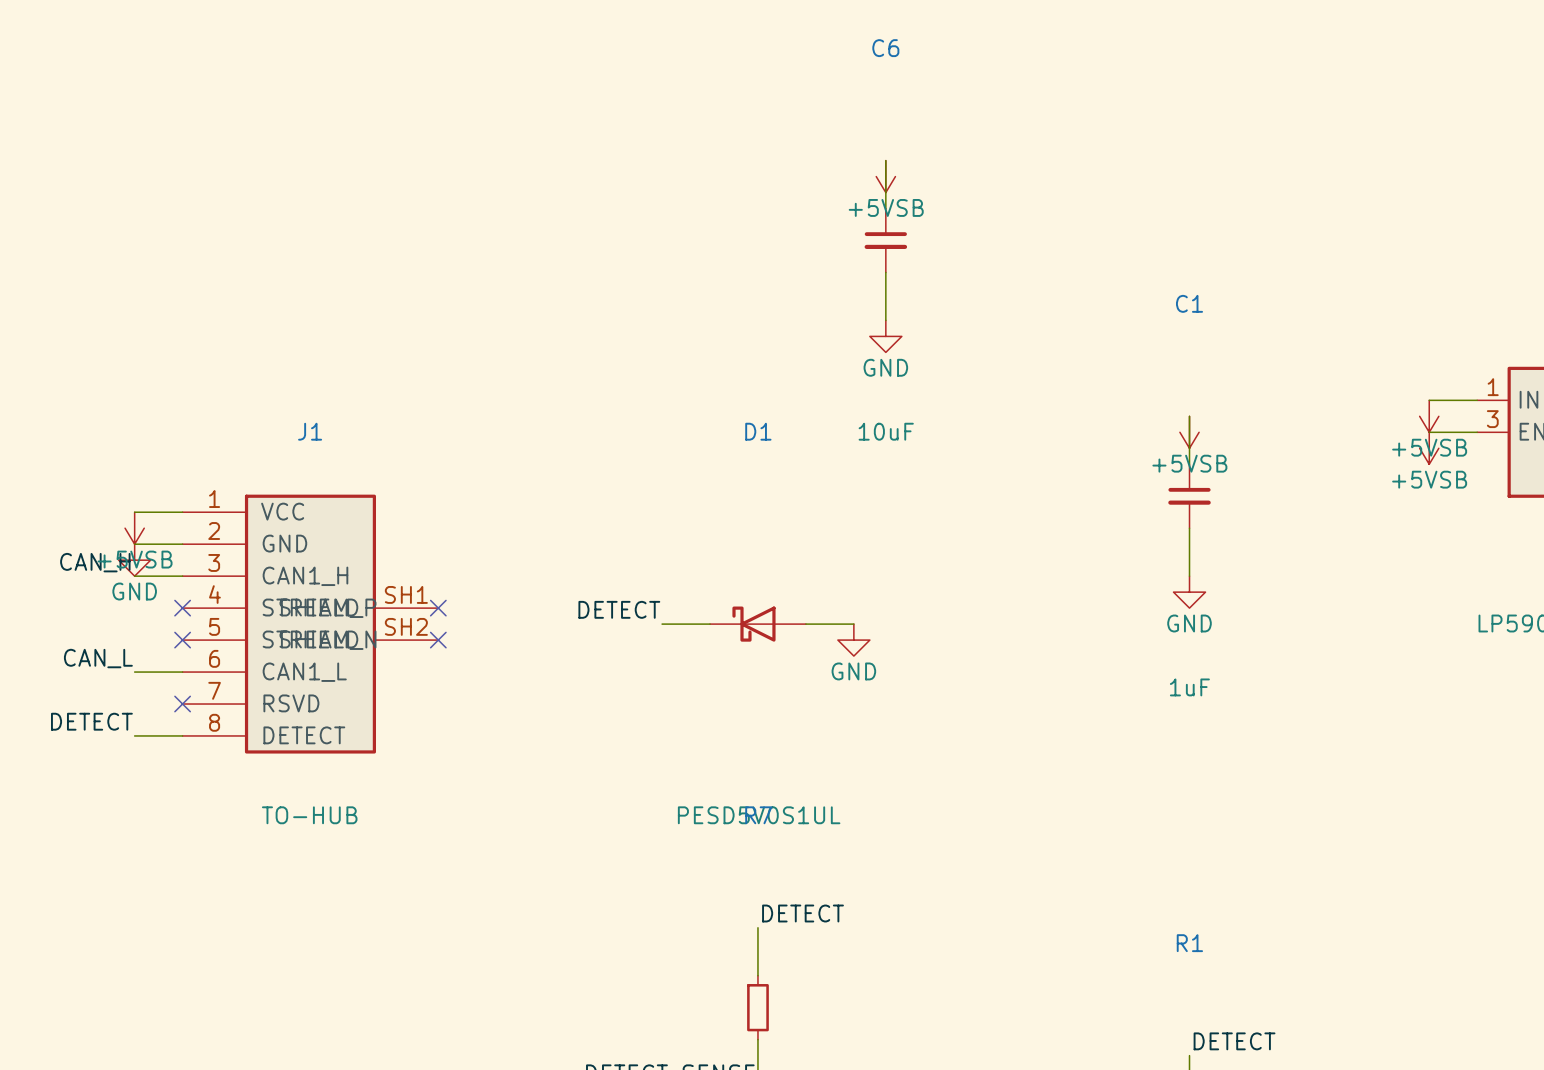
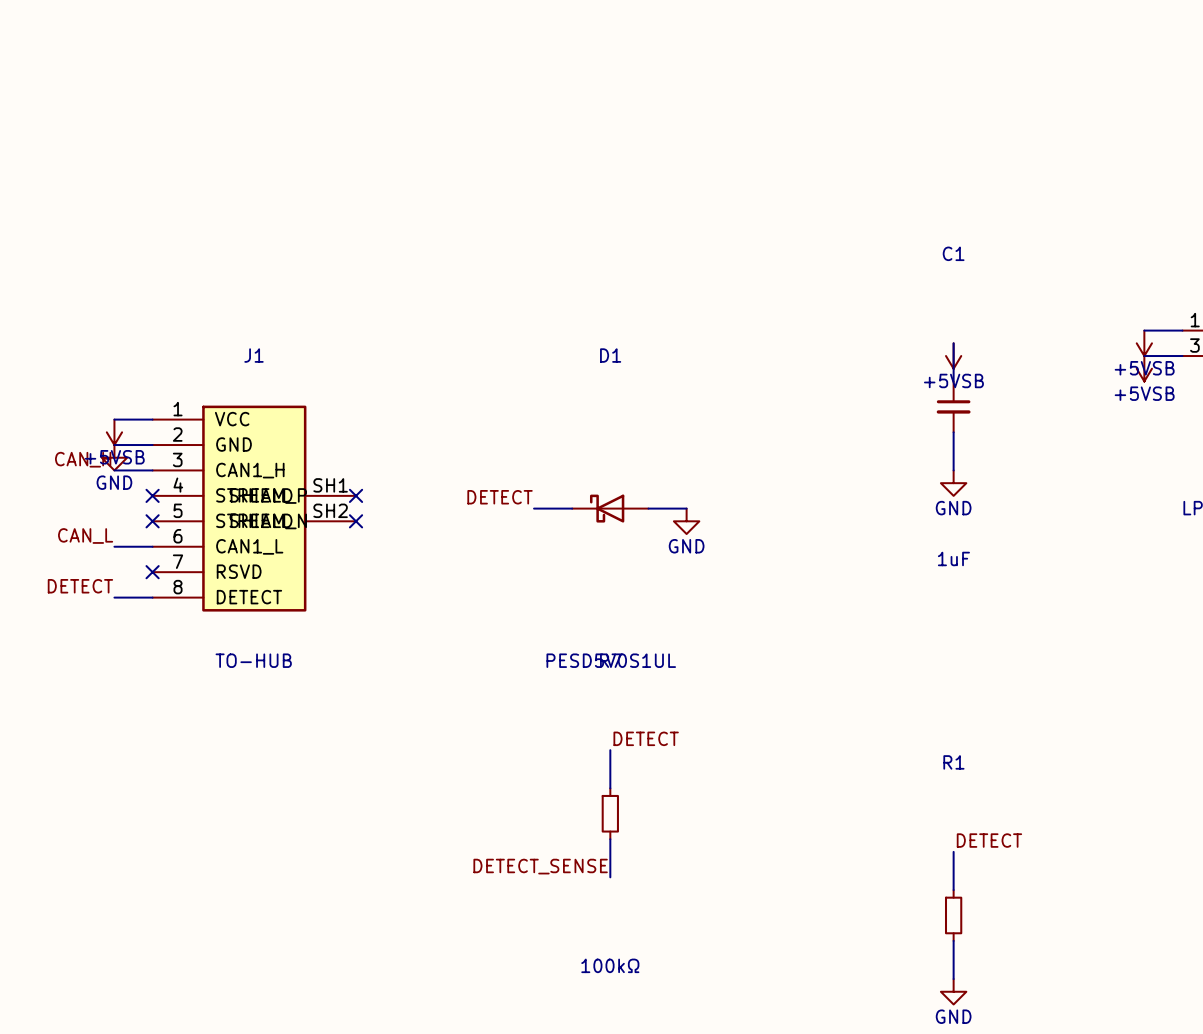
wire: (885, 160) (885, 208) -> none
power symbol: +5VSB (885, 176) -> none
C6: 10uF (885, 240) -> none
wire: (885, 272) (885, 320) -> none
power symbol: GND (885, 336) -> none

